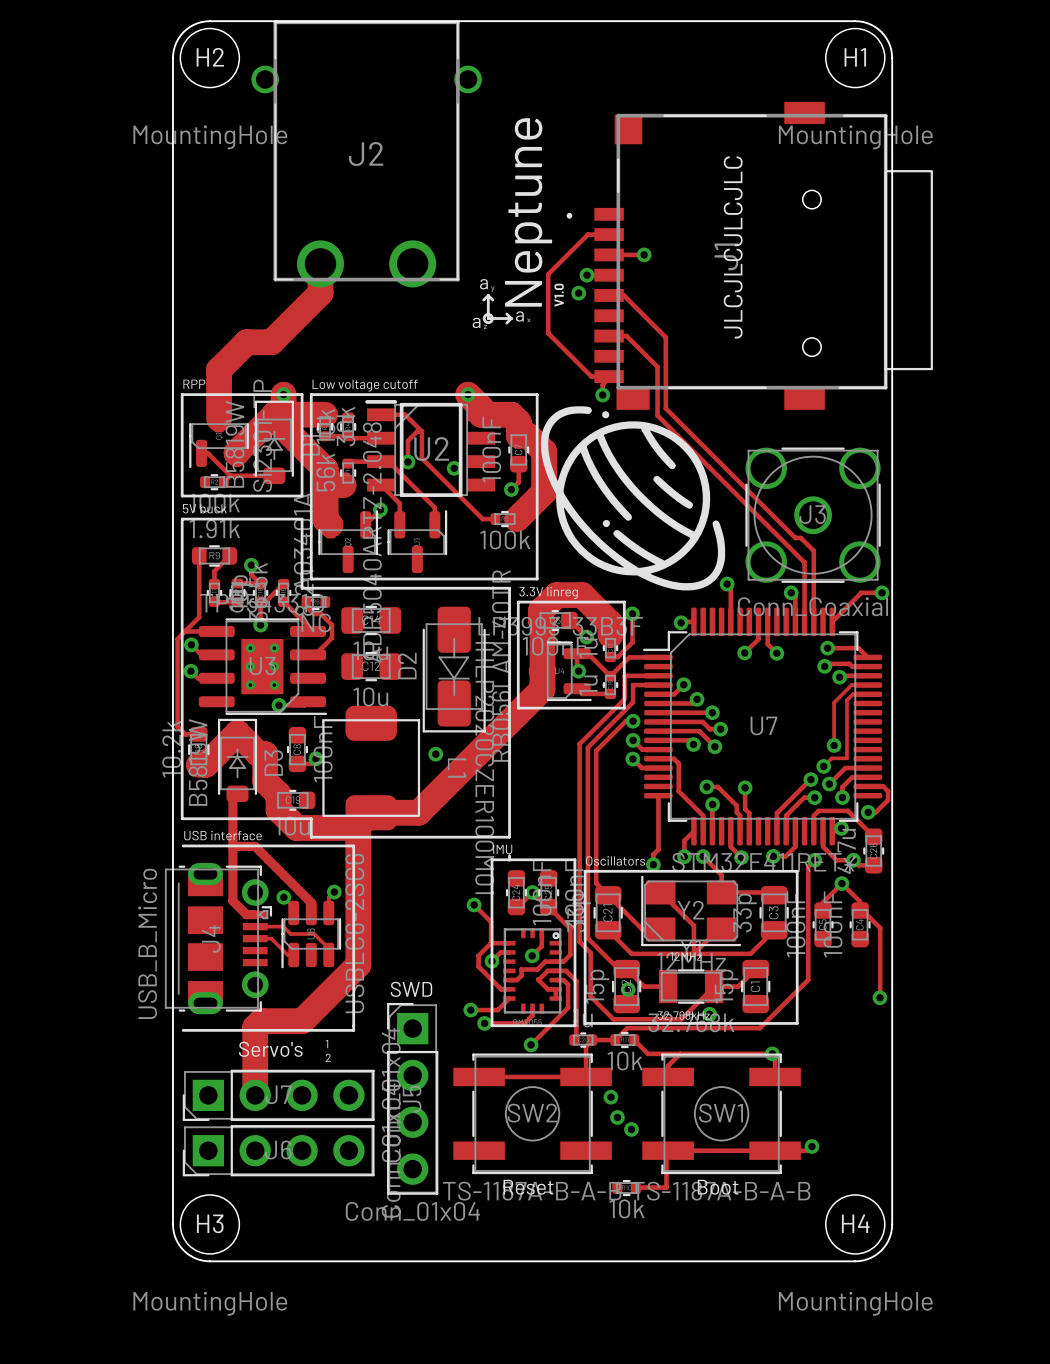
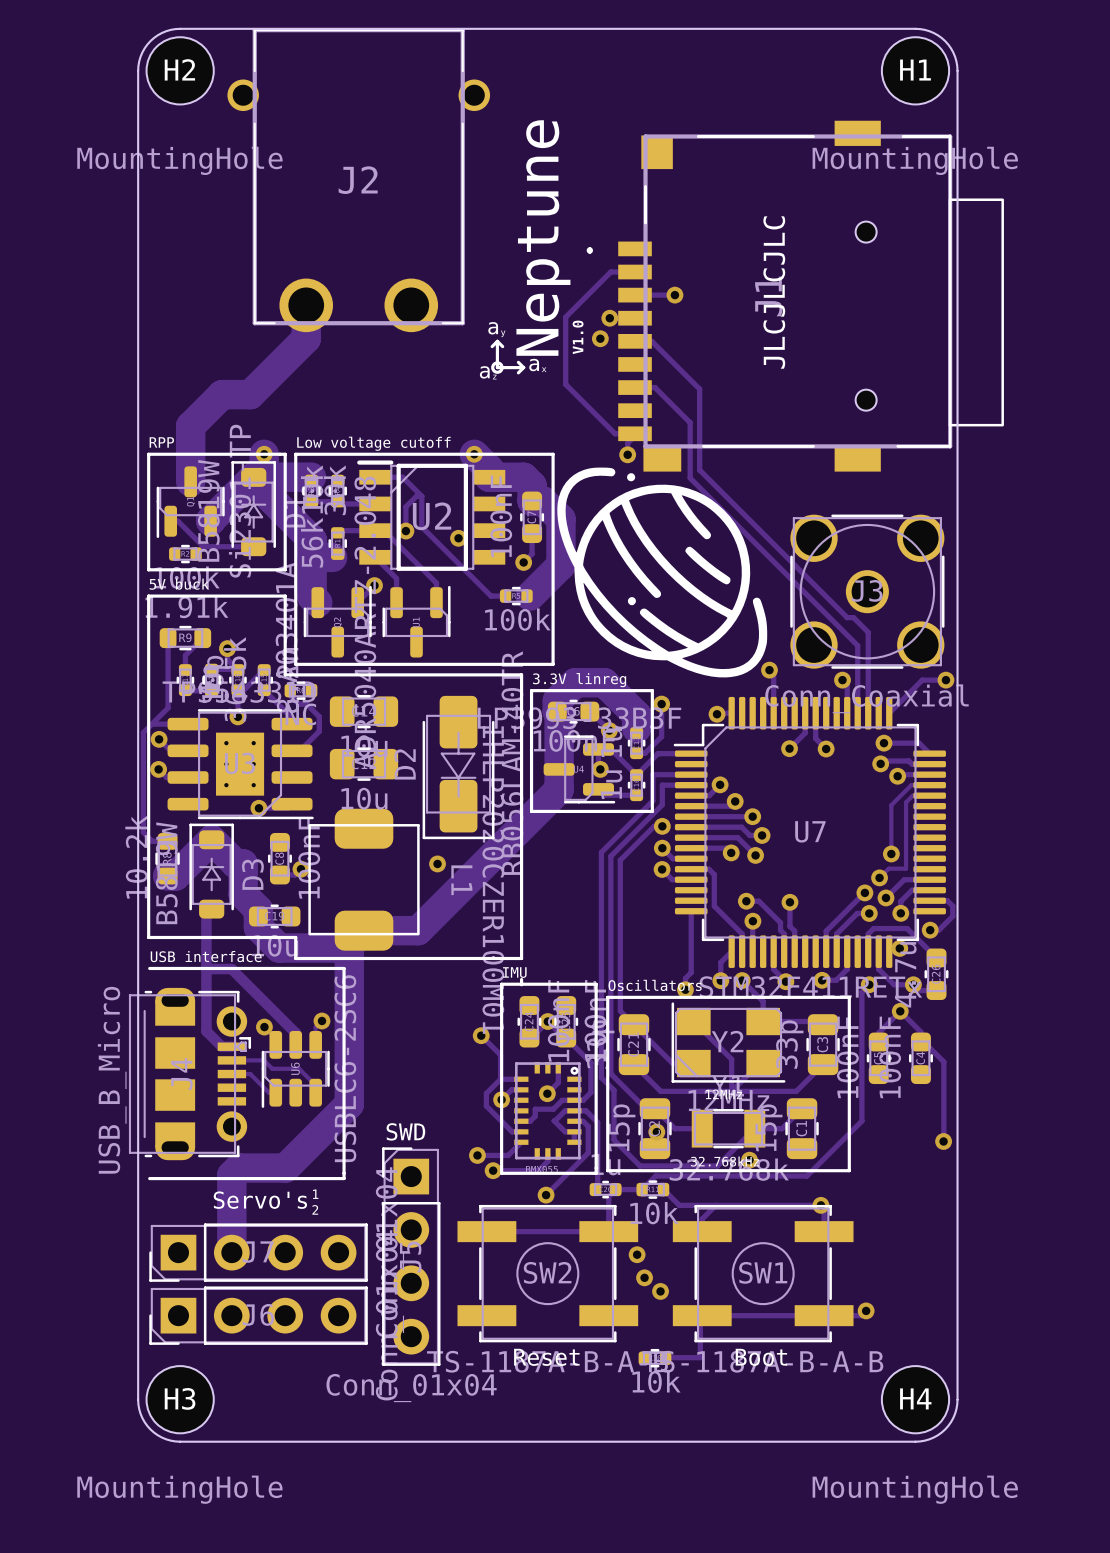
text: JLCJLCJLCJLC (733, 247) -> JLCJLCJLC (774, 292)

